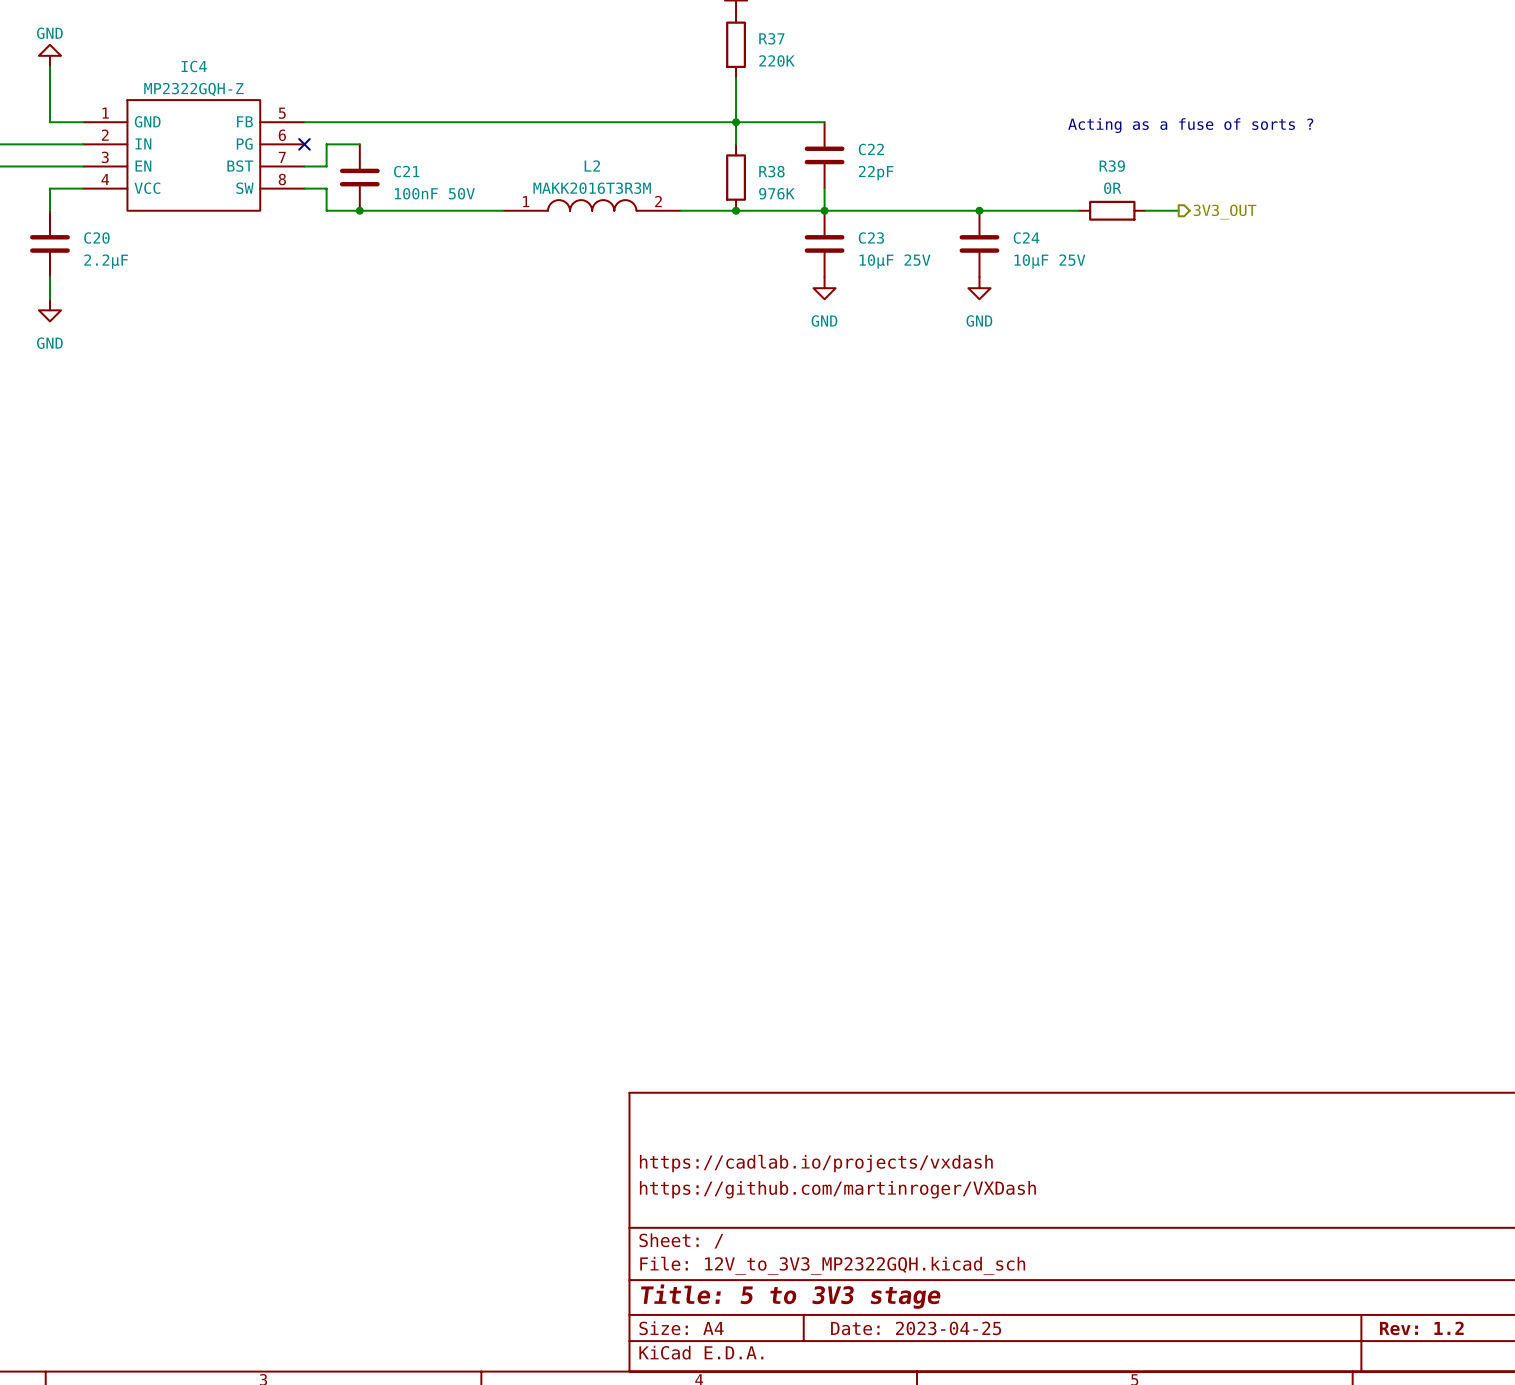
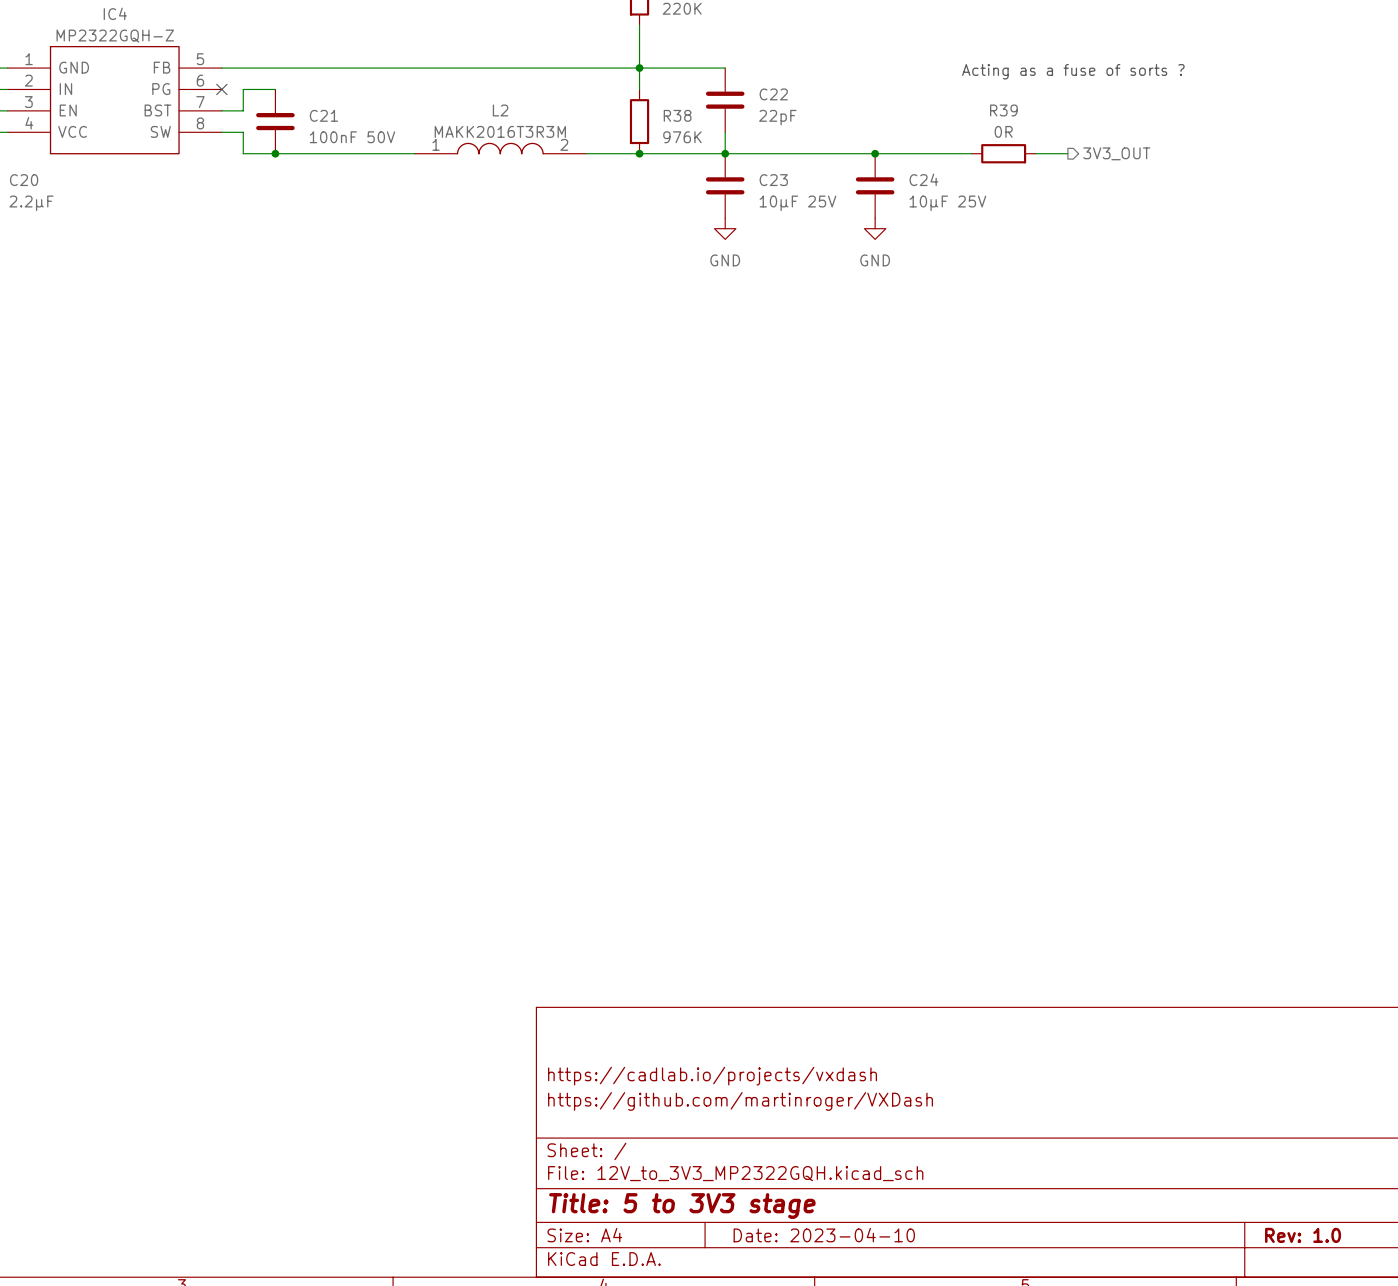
title block: Date: 2023-04-25 (916, 1328) -> Date: 2023-04-10 (824, 1235)
title block: Rev: 1.2 (1421, 1328) -> Rev: 1.0 (1303, 1235)

